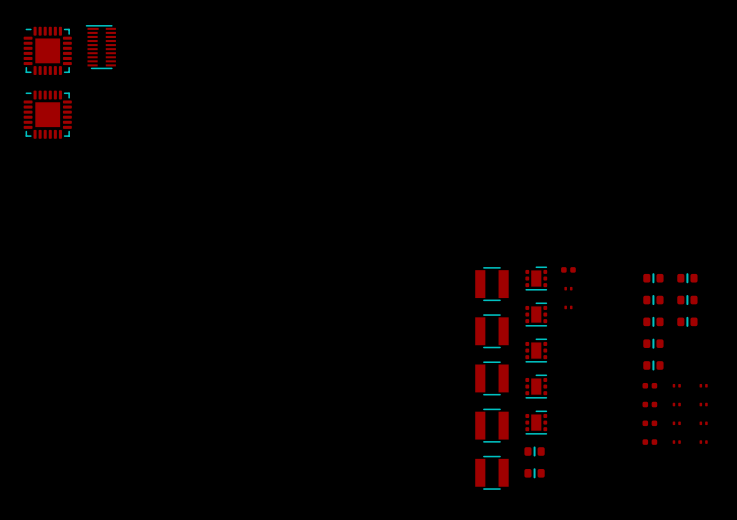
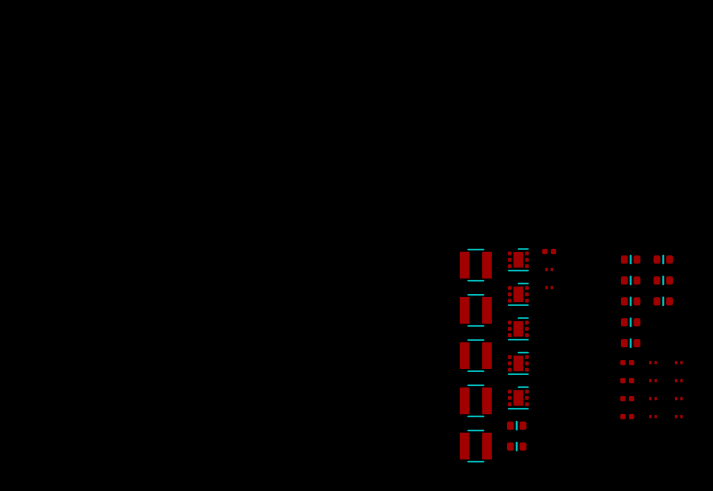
part: (100, 47) -> none
part: (47, 50) -> none
part: (47, 114) -> none

